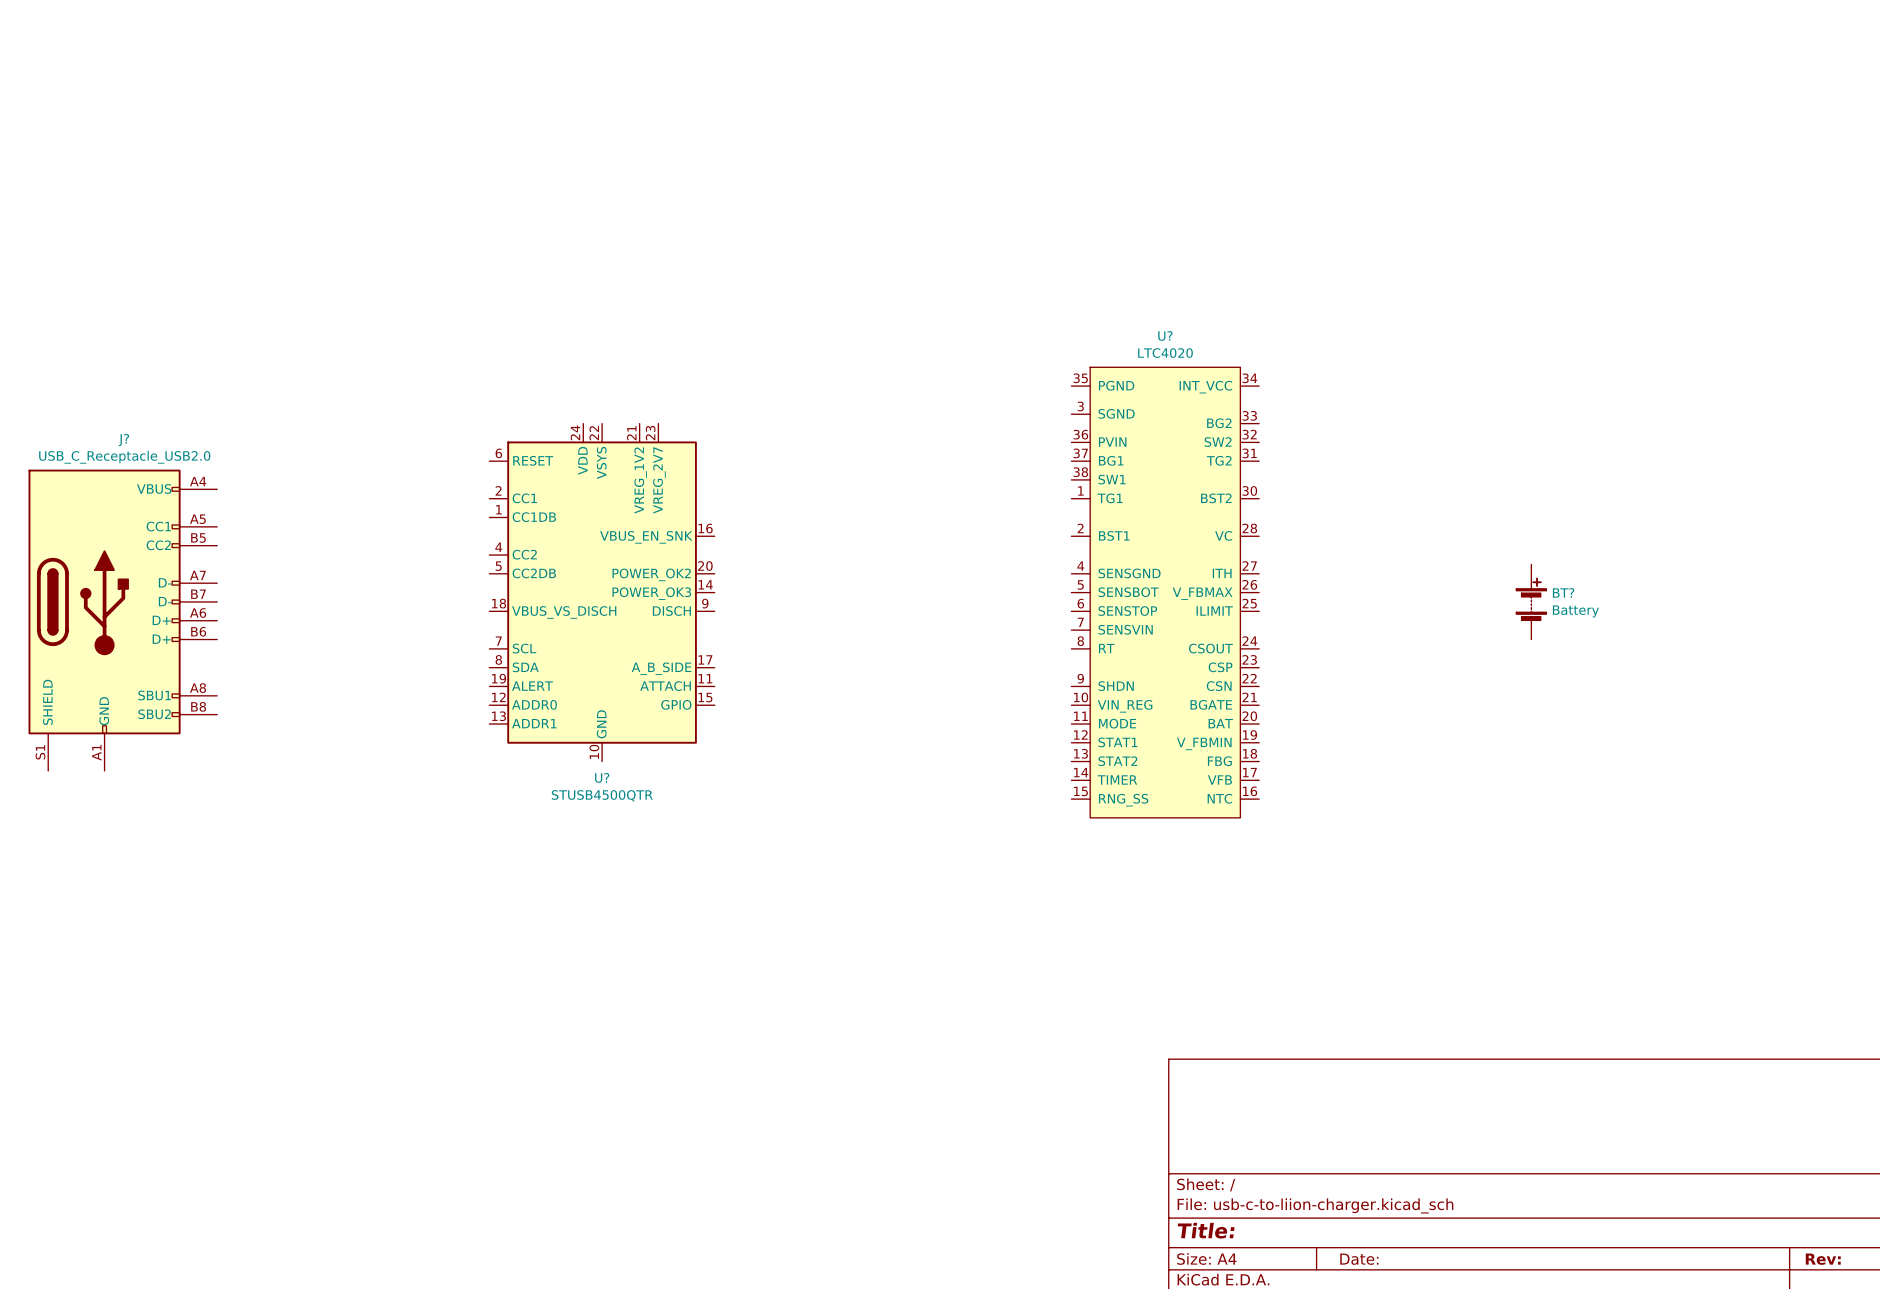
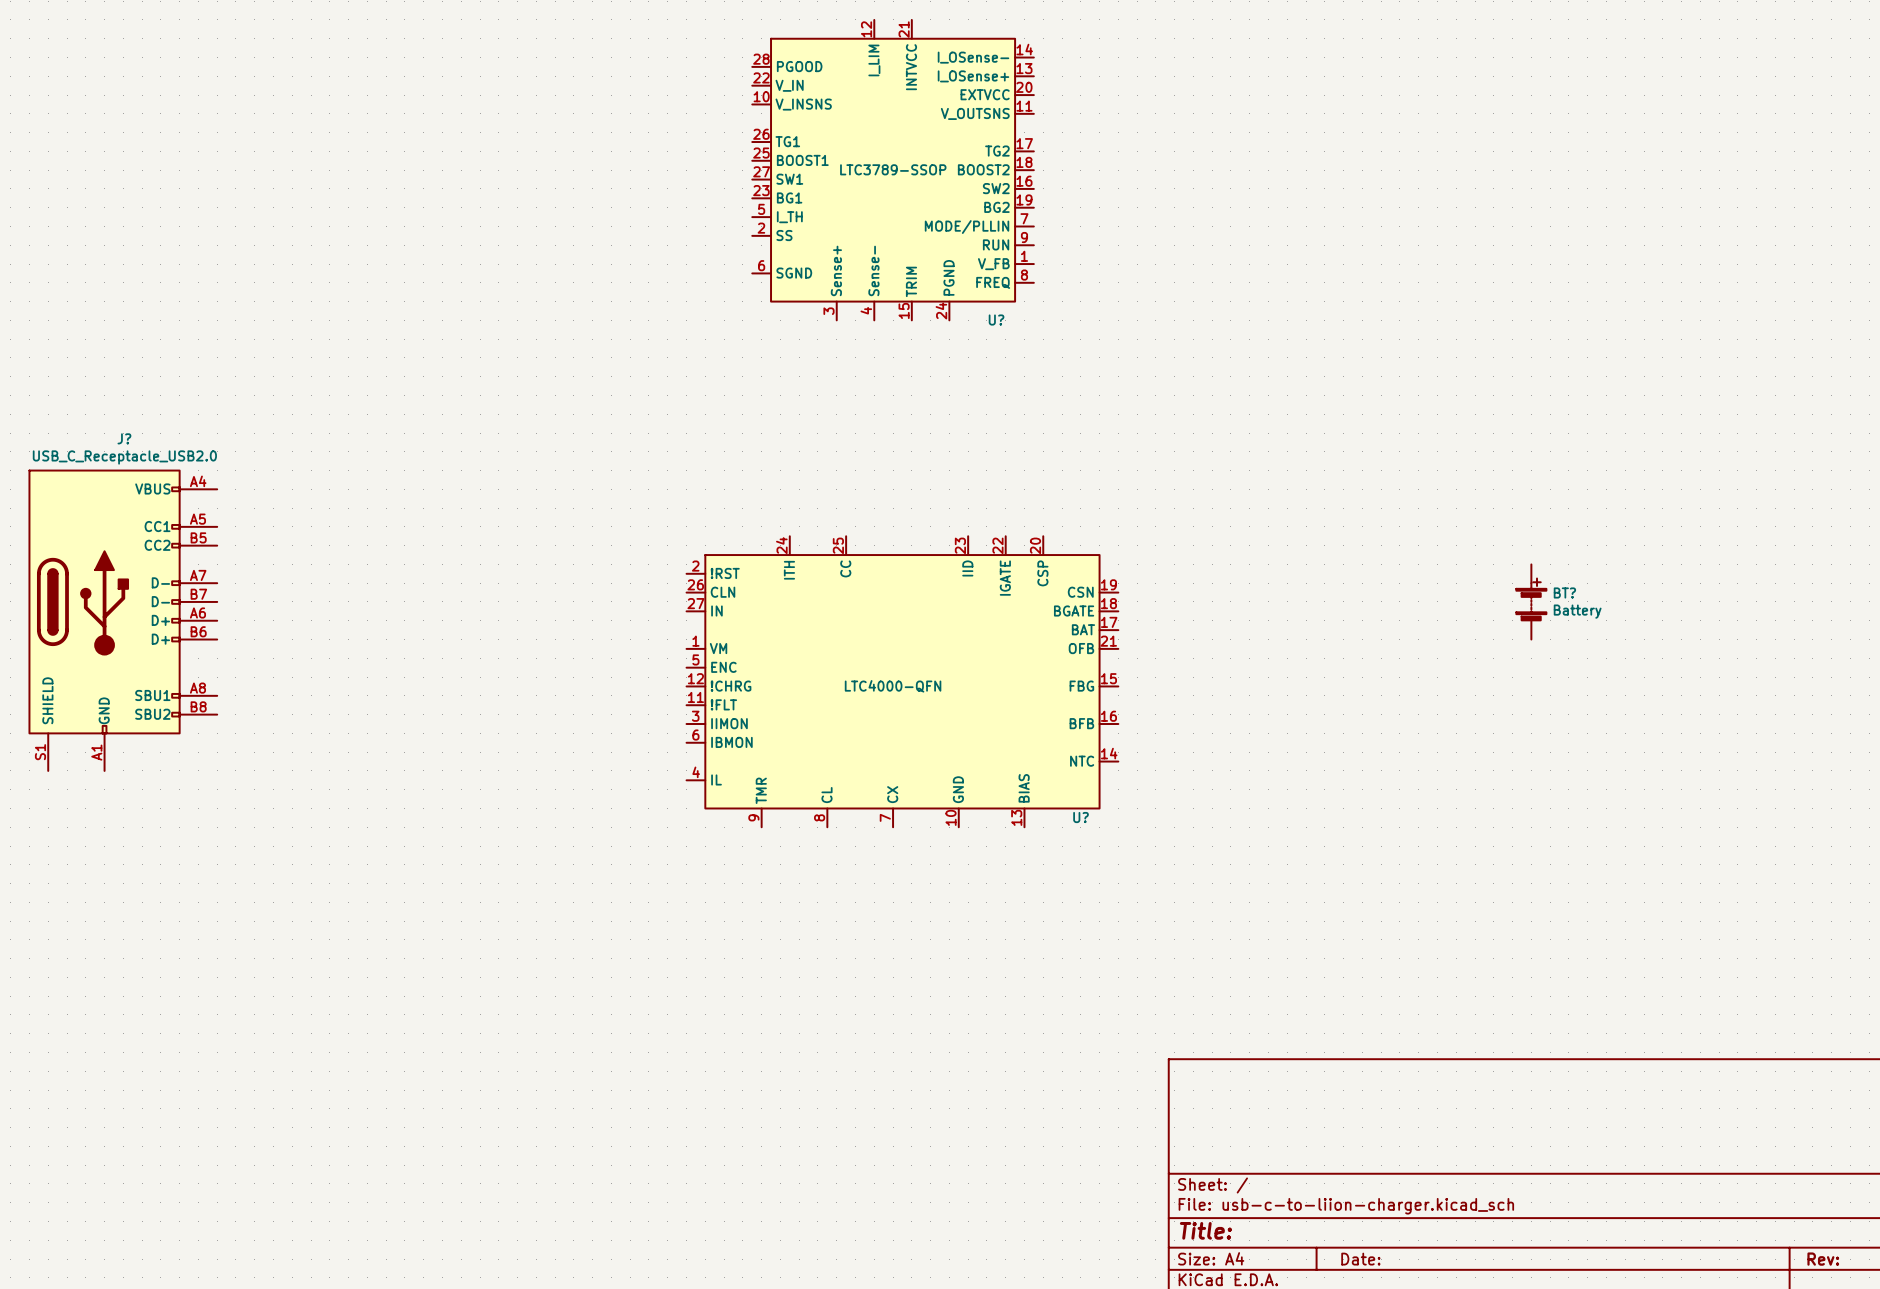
U?: none -> LTC3789-SSOP (893, 170)
U?: STUSB4500QTR (602, 592) -> none
U?: LTC4020 (1165, 592) -> none
U?: none -> LTC4000-QFN (902, 681)

